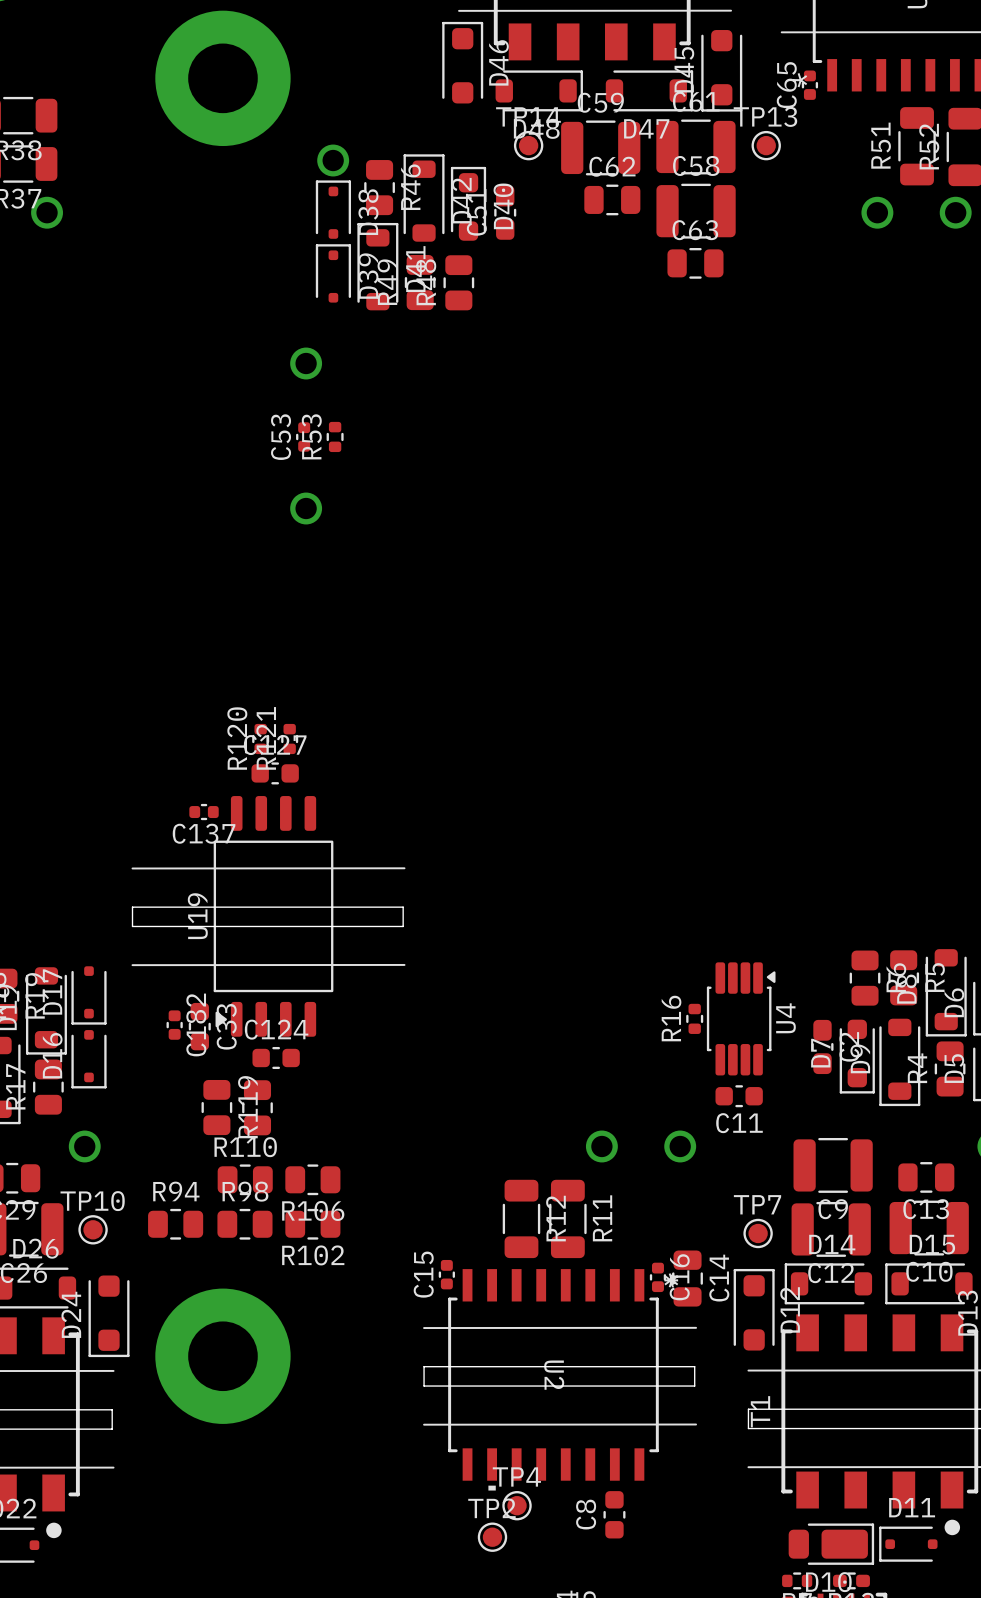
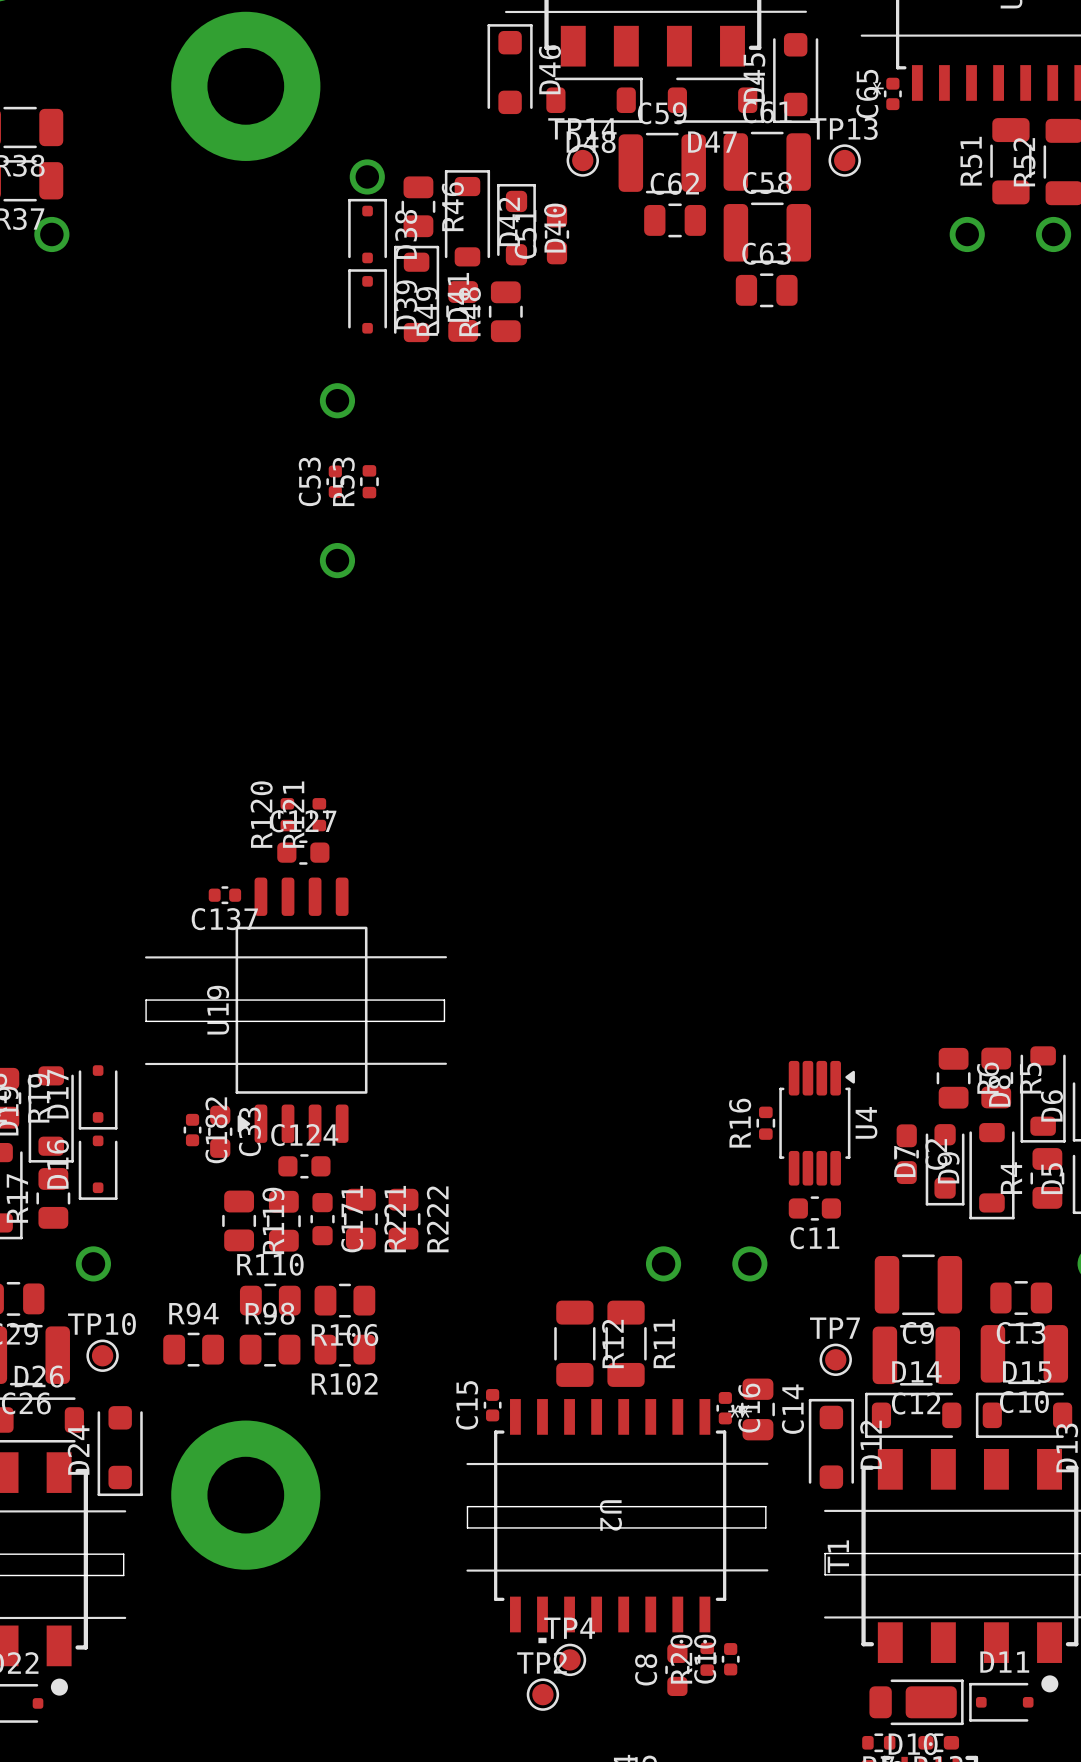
C171: none -> (322, 1219)
R221: none -> (360, 1219)
R222: none -> (403, 1219)
R20: none -> (707, 1659)
C10: none -> (730, 1659)

